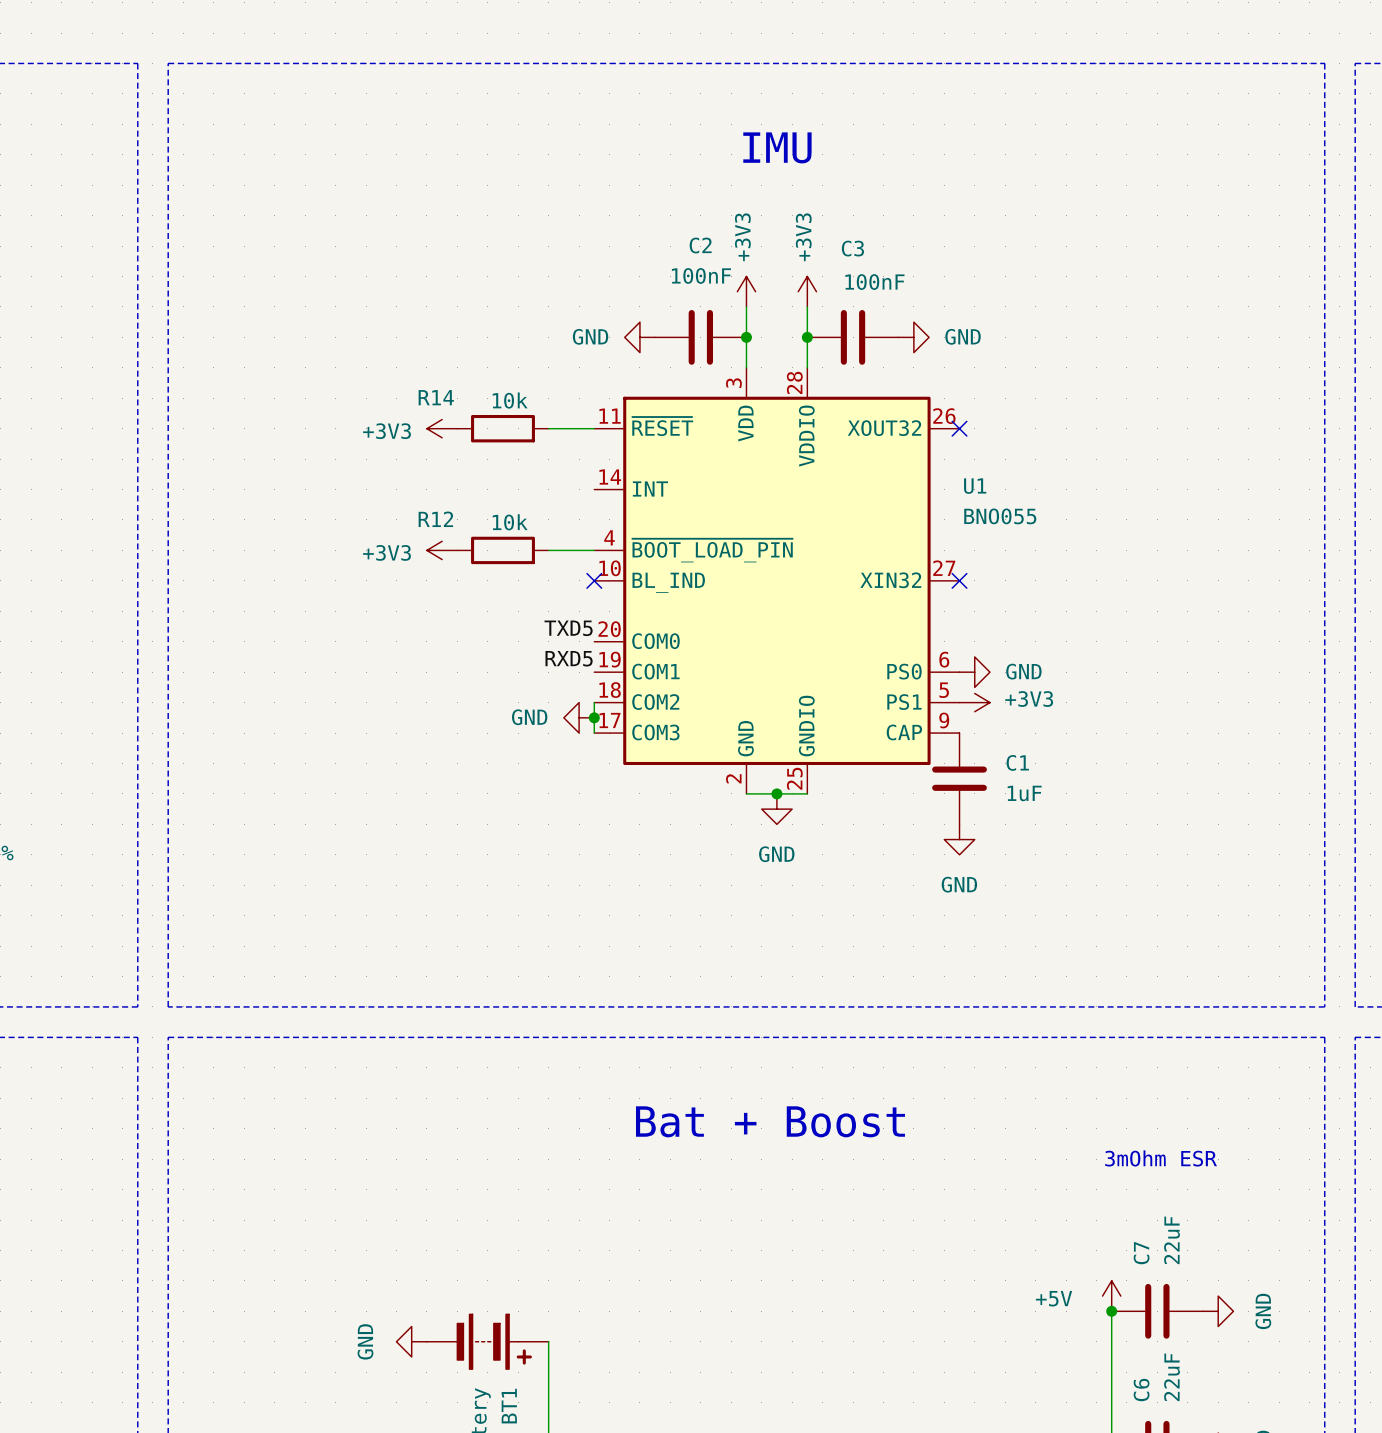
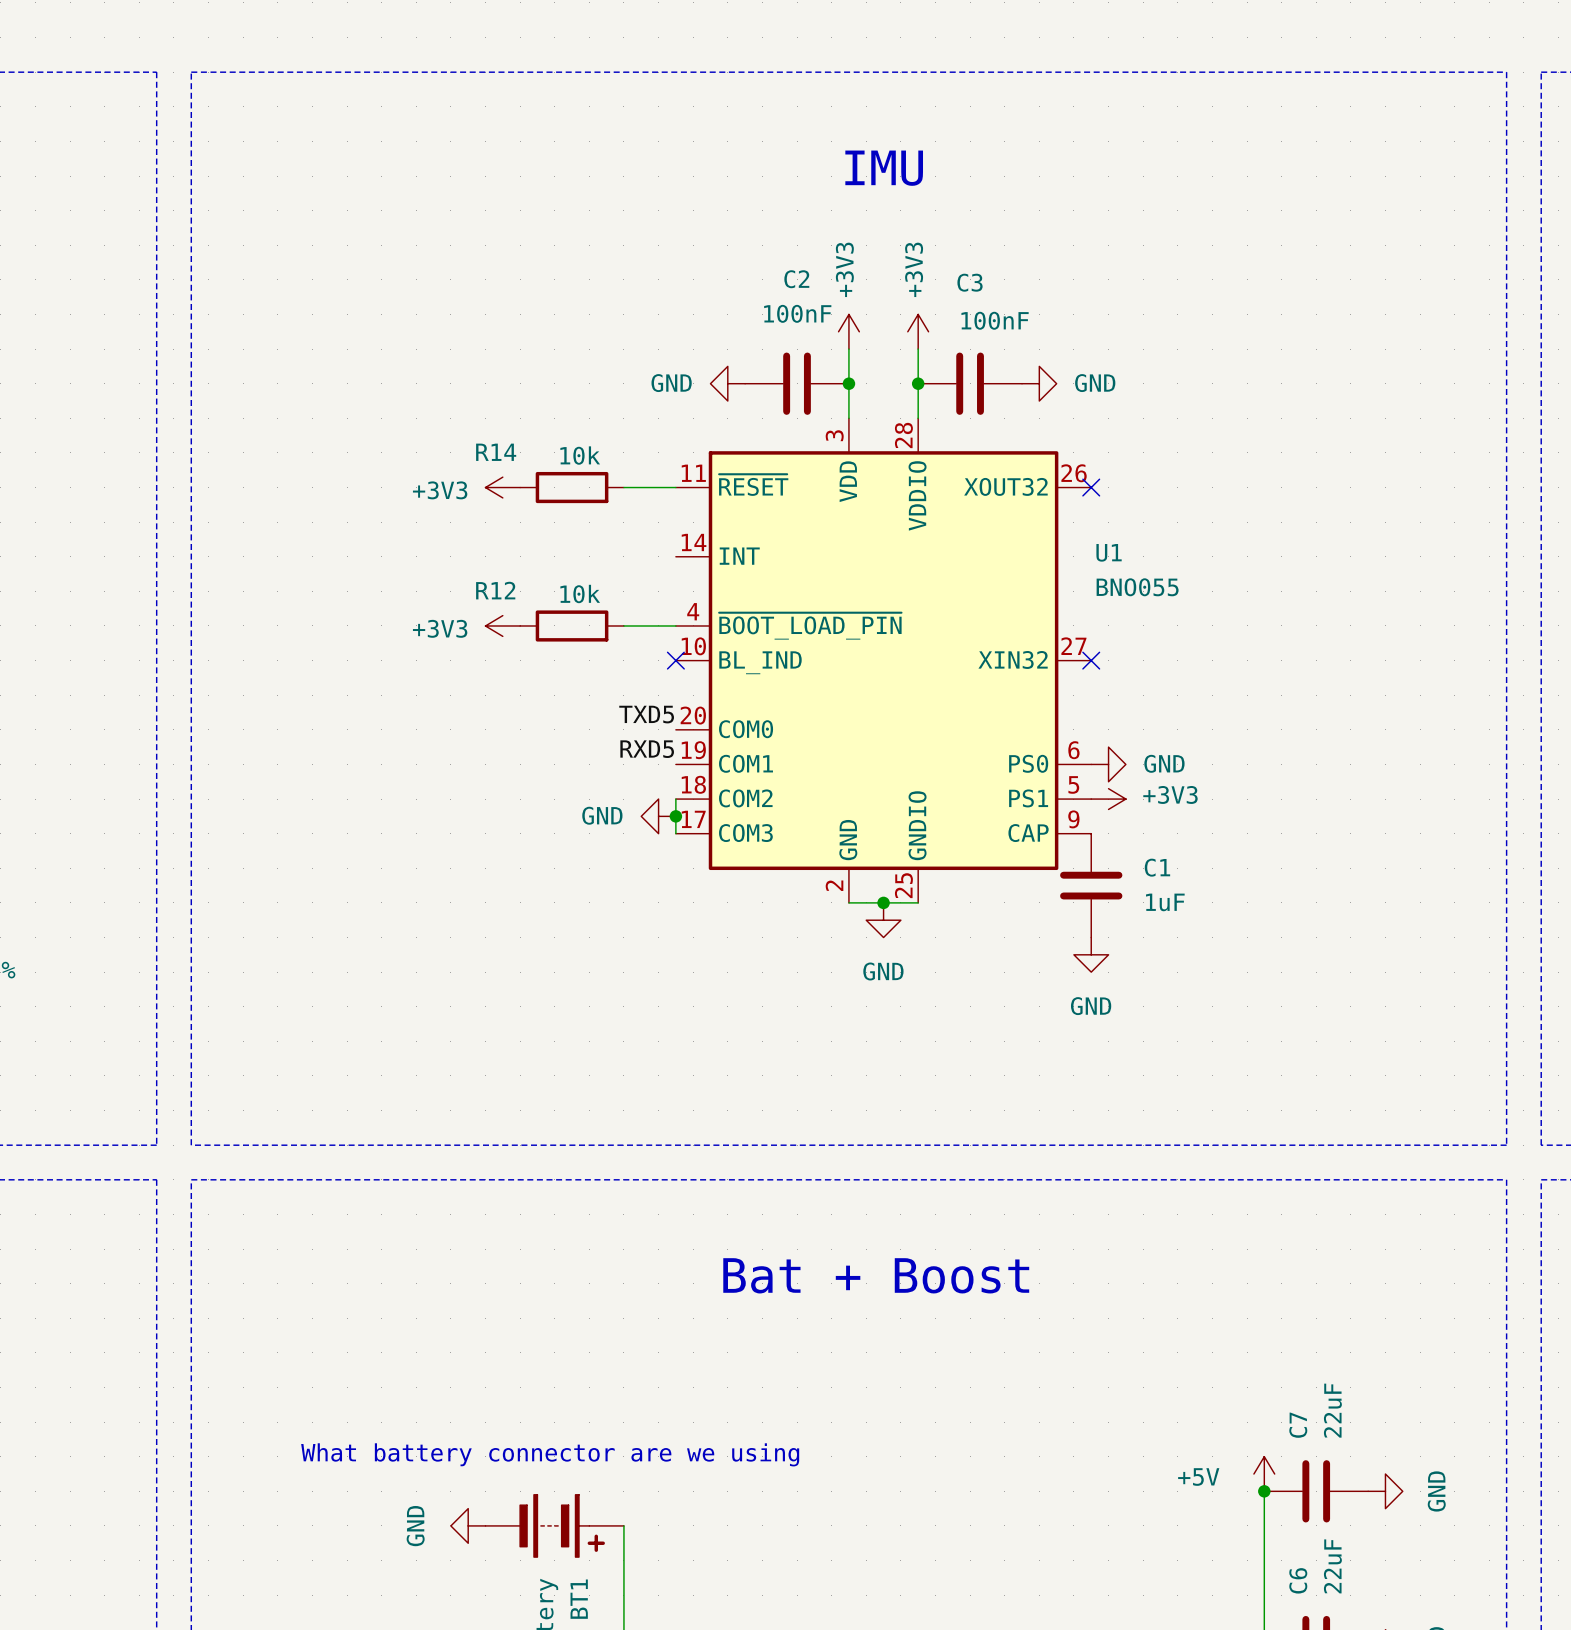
text: 3mOhm ESR (1161, 1158) -> none
text: none -> What battery connector are we using (550, 1454)

